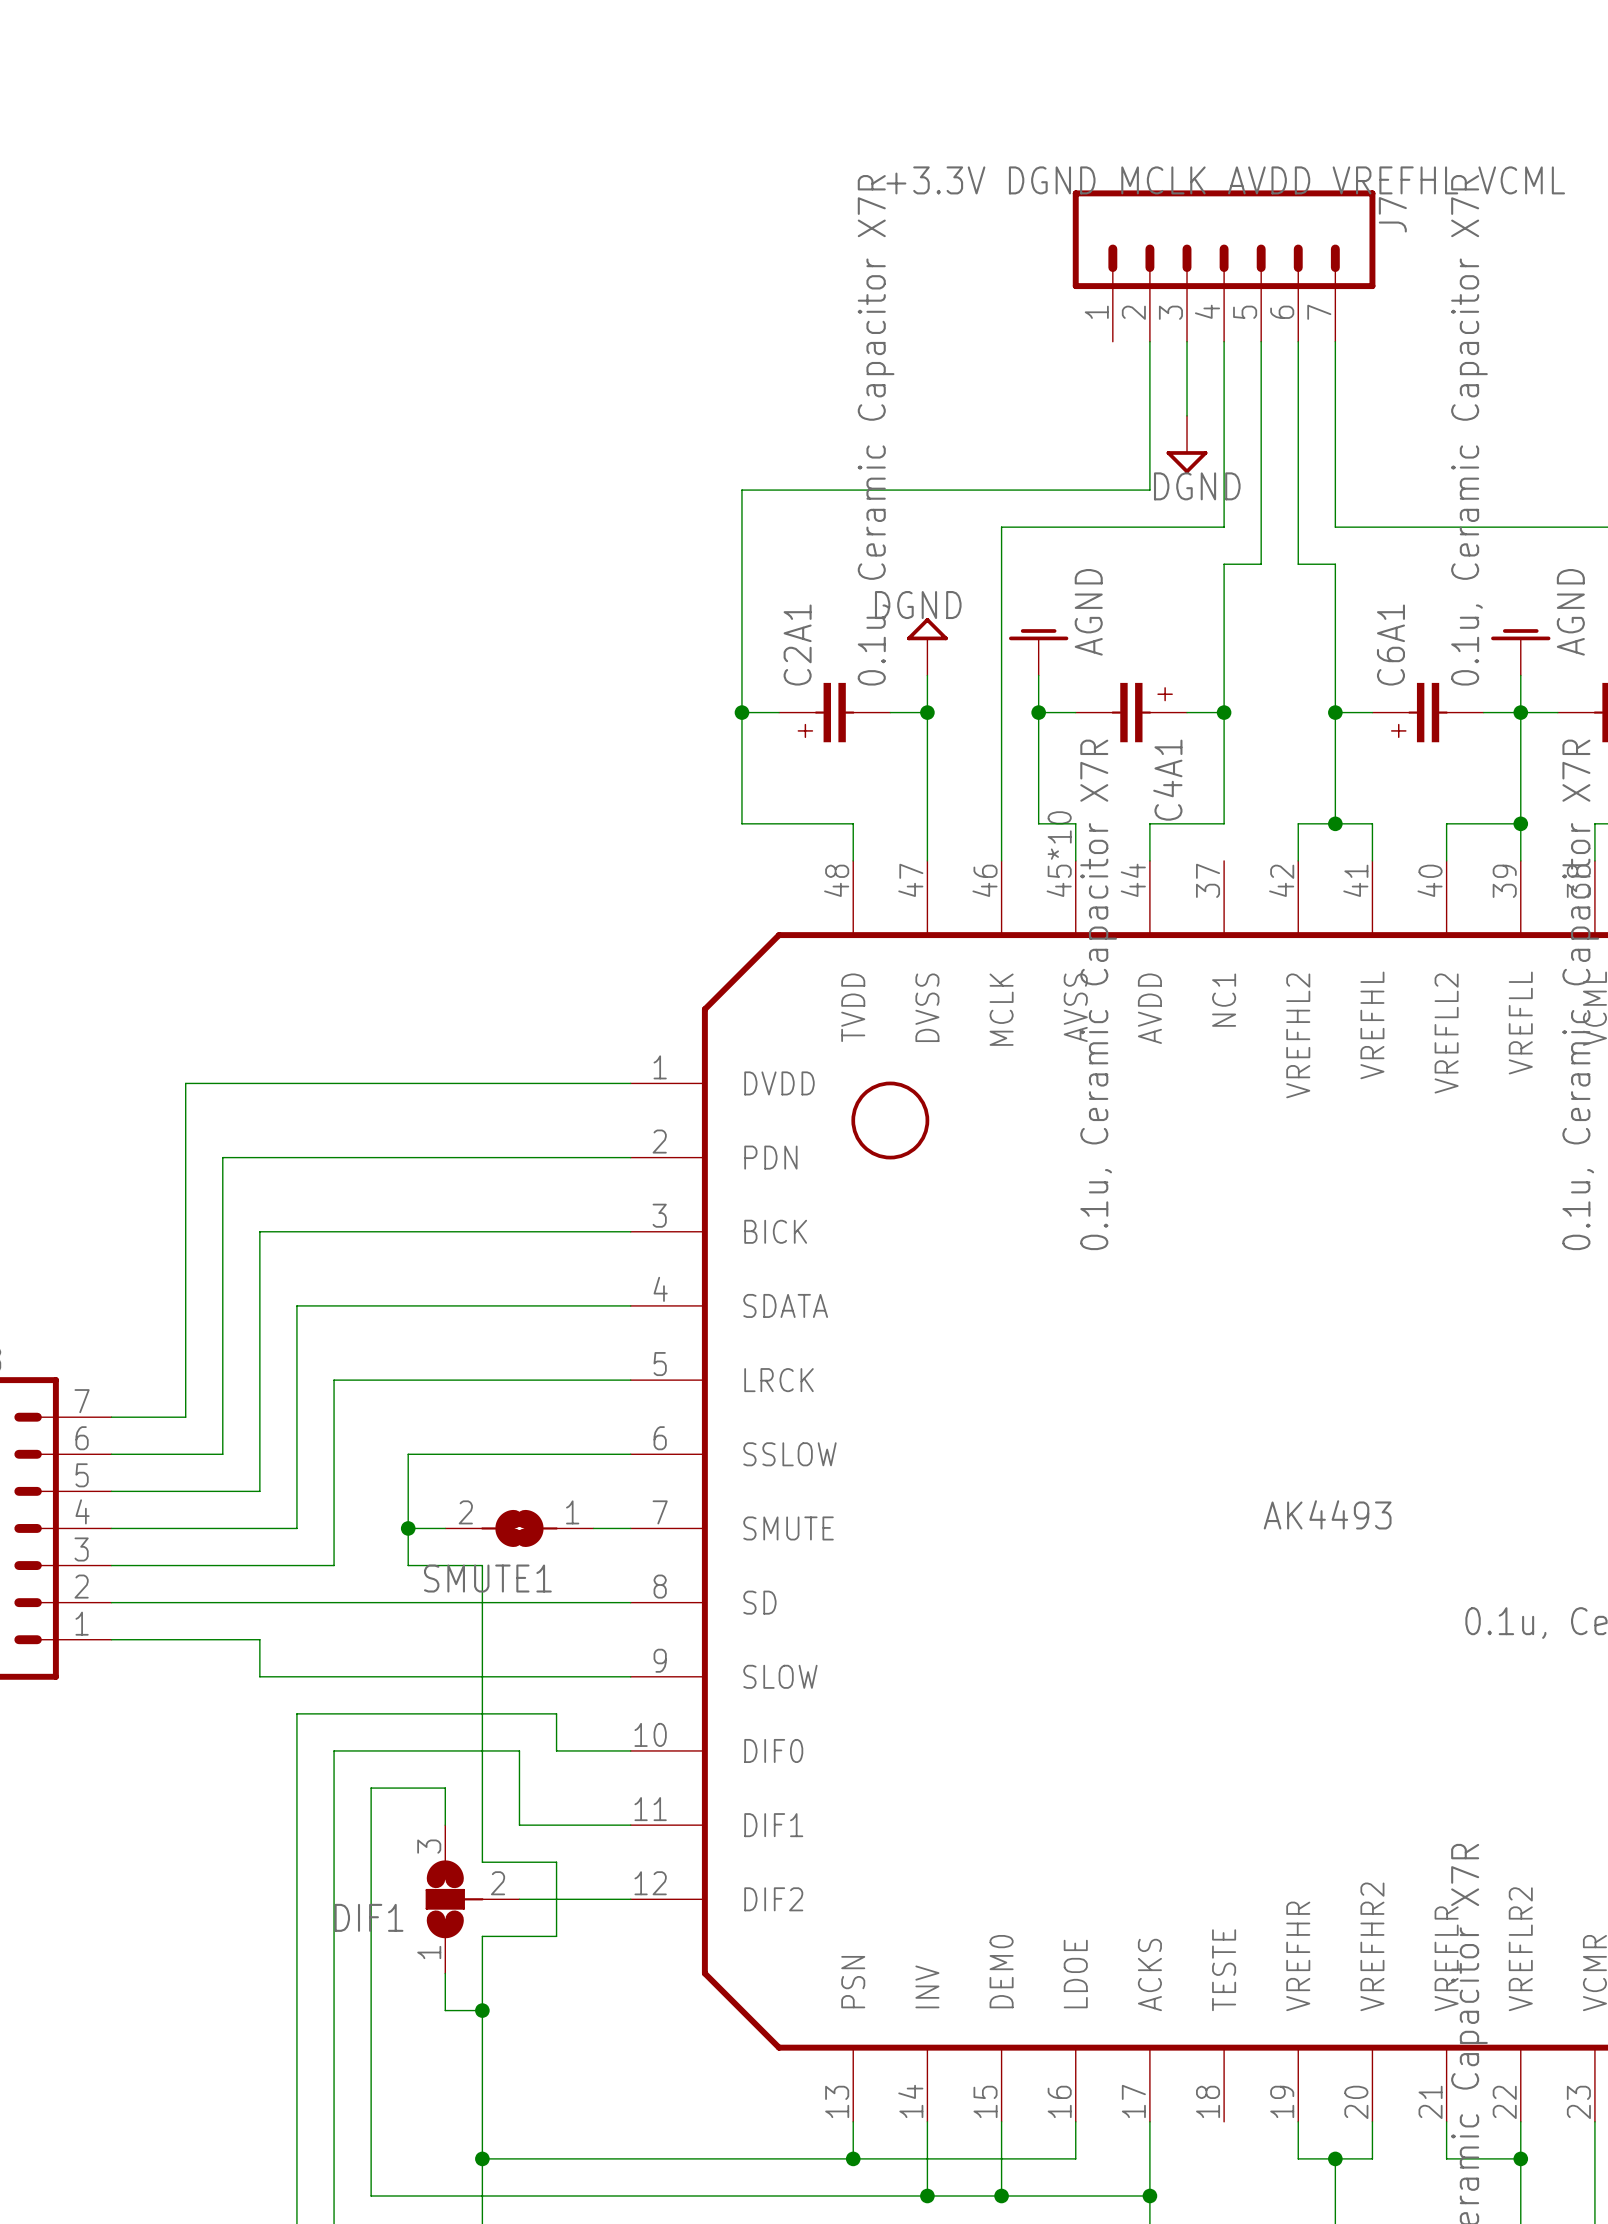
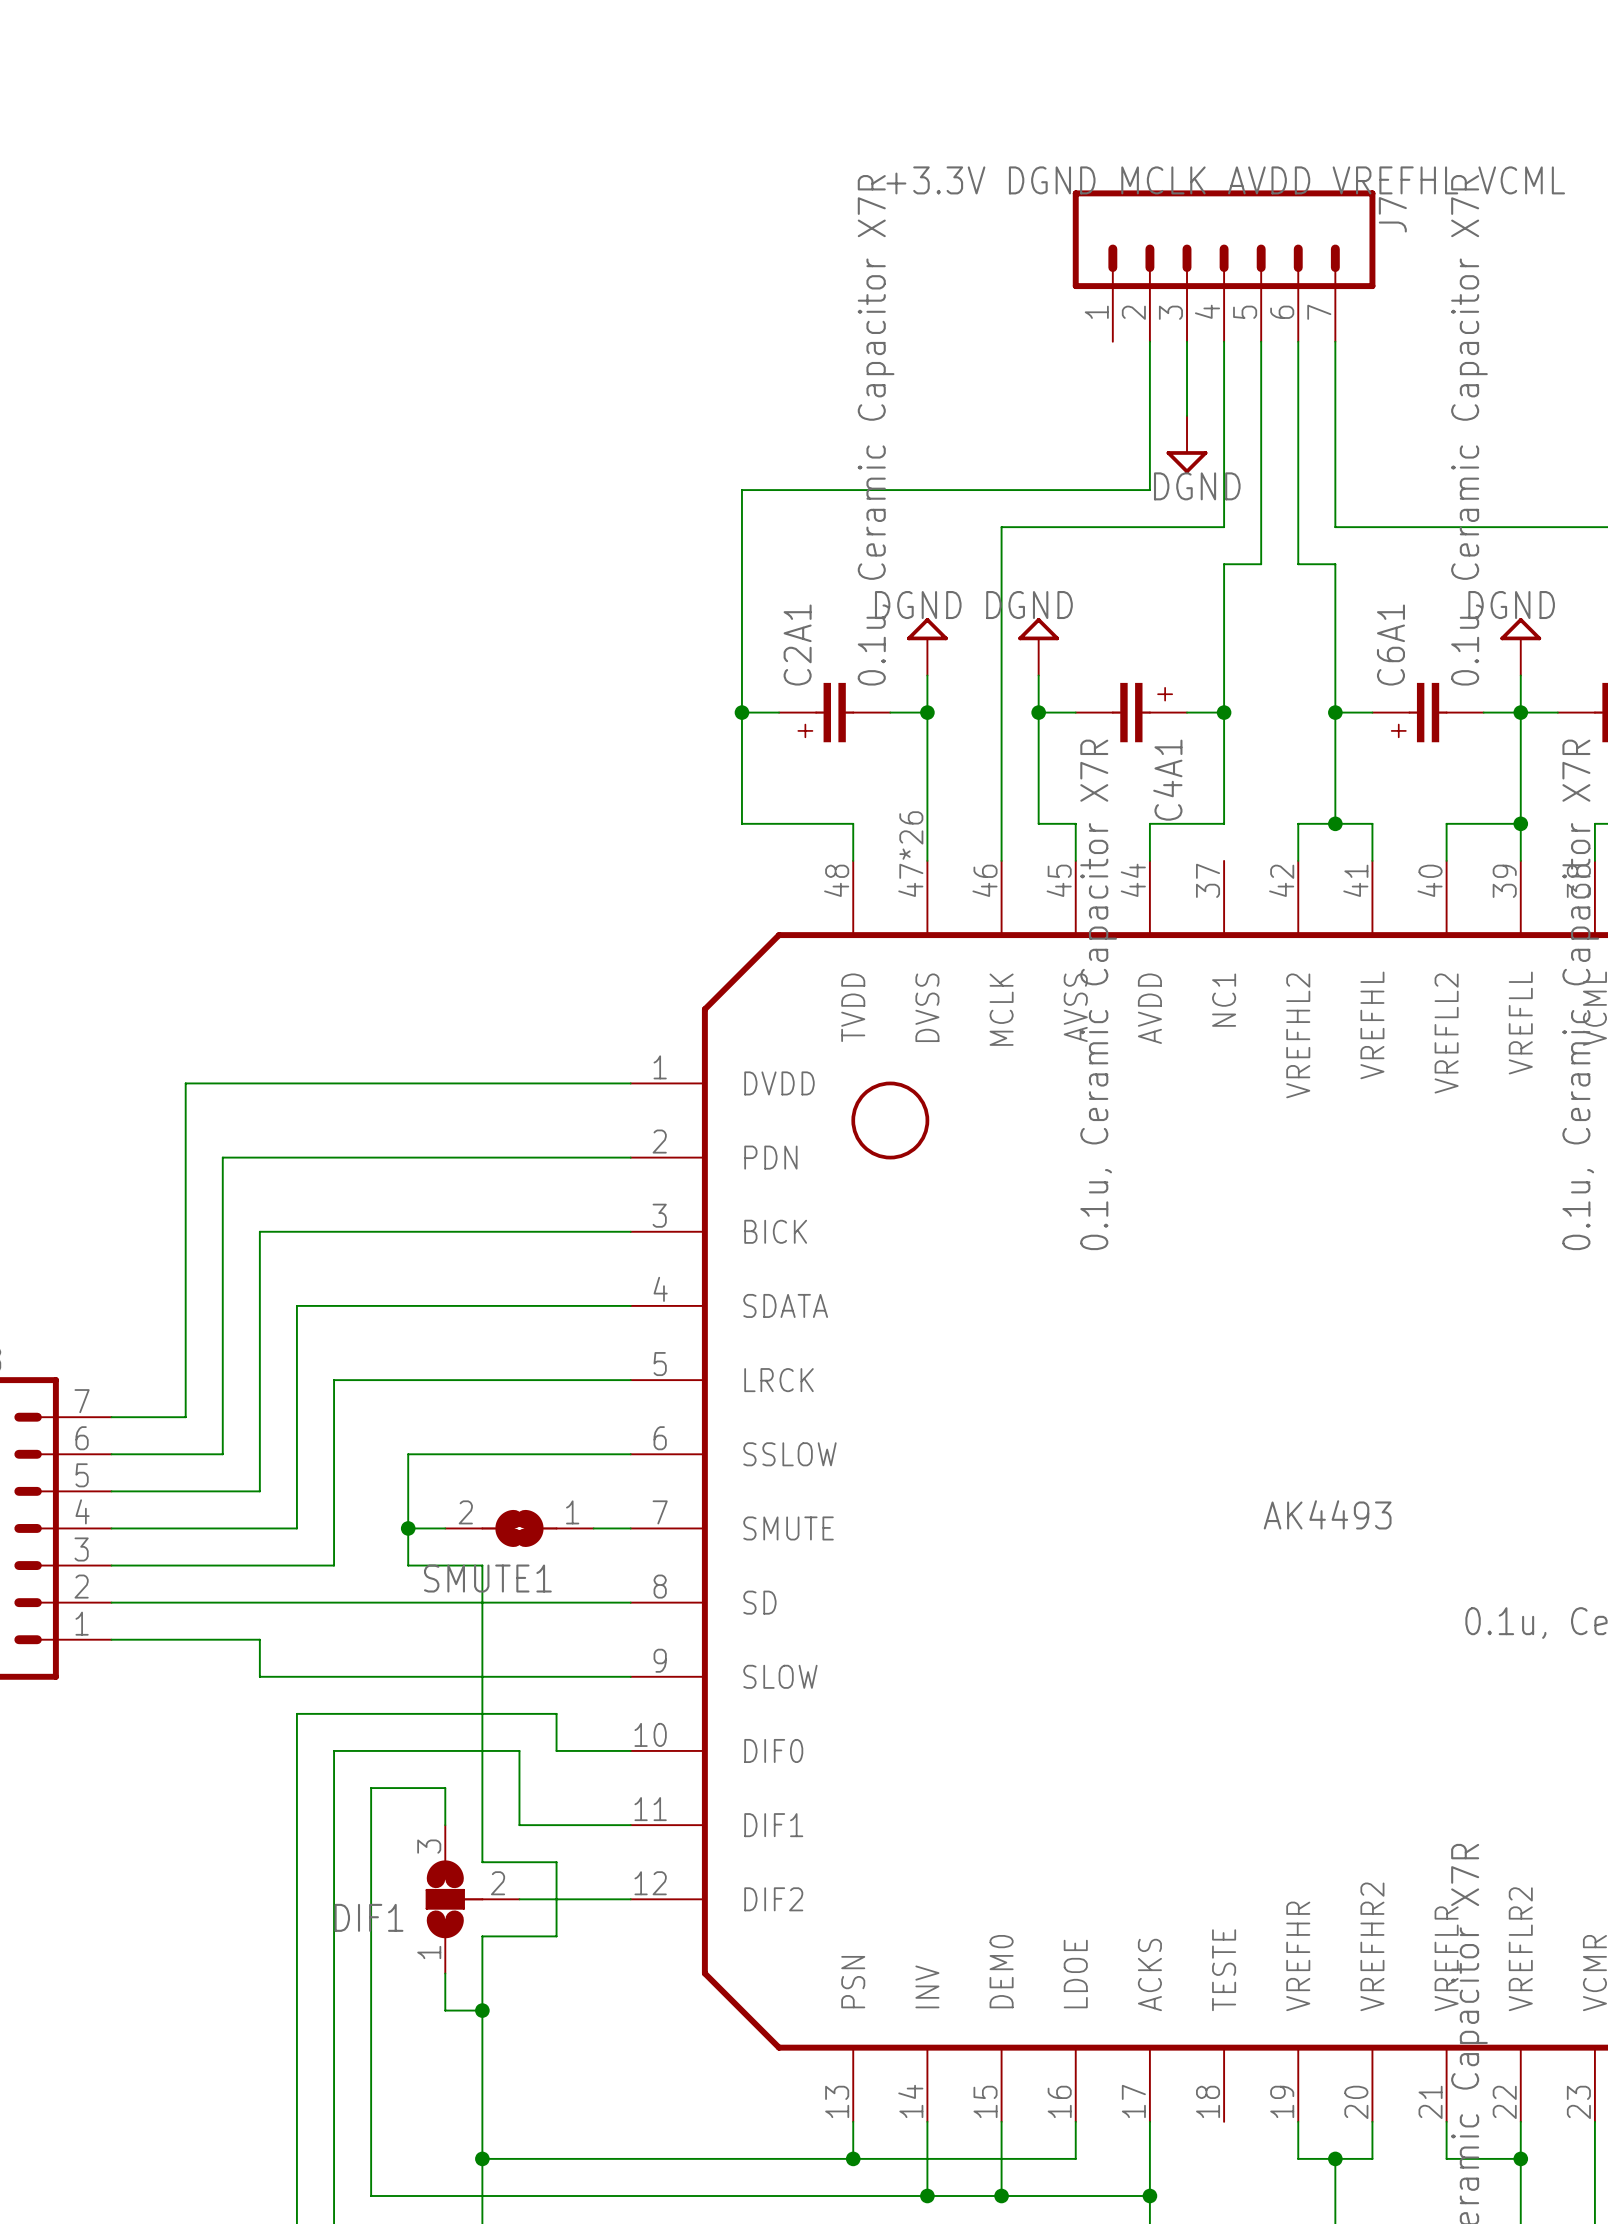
power symbol: AGND (1038, 652) -> DGND (1038, 646)
power symbol: AGND (1520, 652) -> DGND (1520, 646)
part pin number: 45*10 (1059, 854) -> 45 (1059, 880)
part pin number: 47 (910, 880) -> 47*26 (910, 854)

